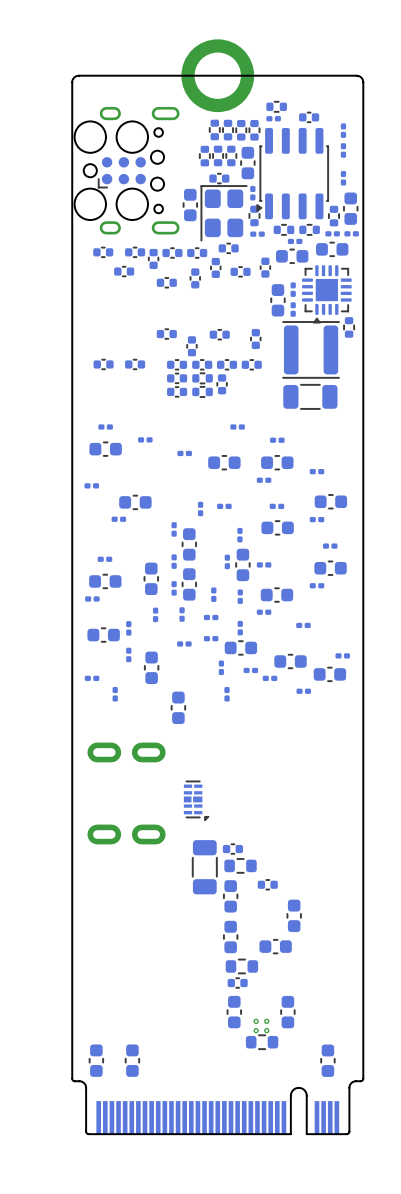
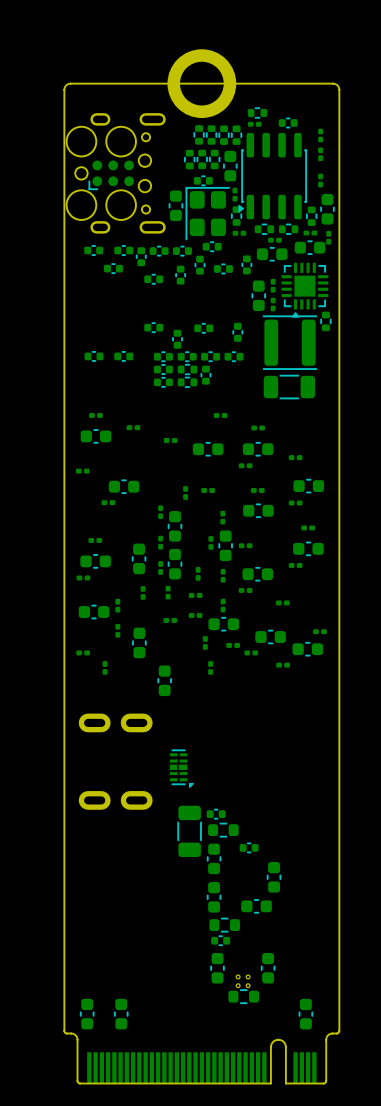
part rotation: 0° (351, 233) -> 90° clockwise (328, 237)

